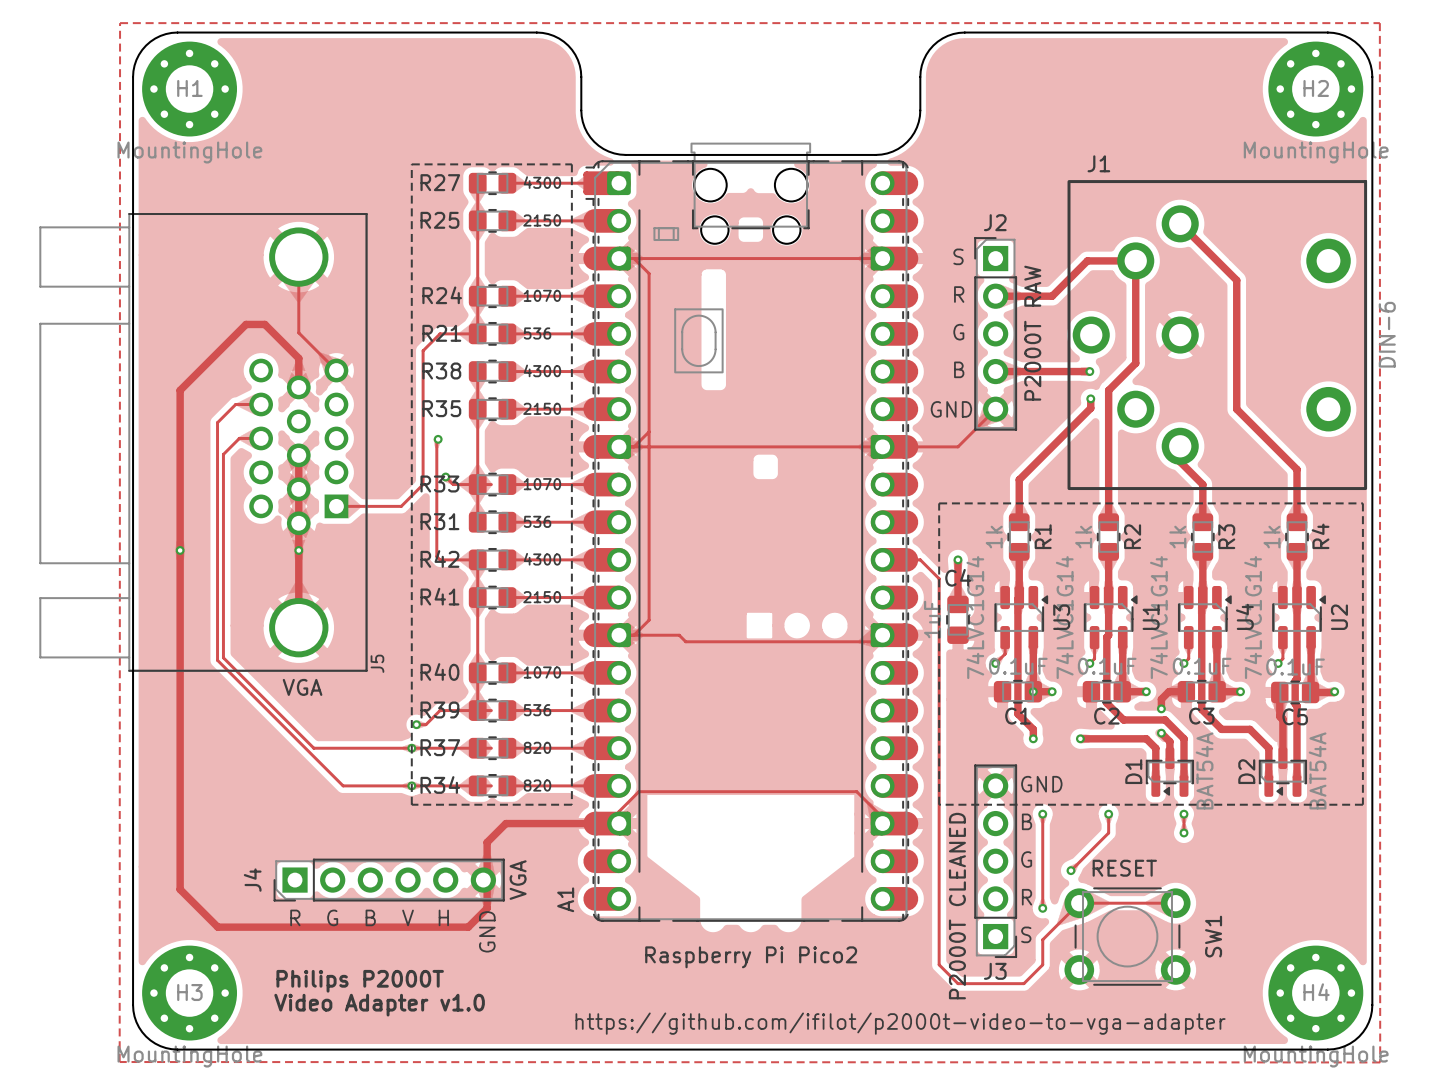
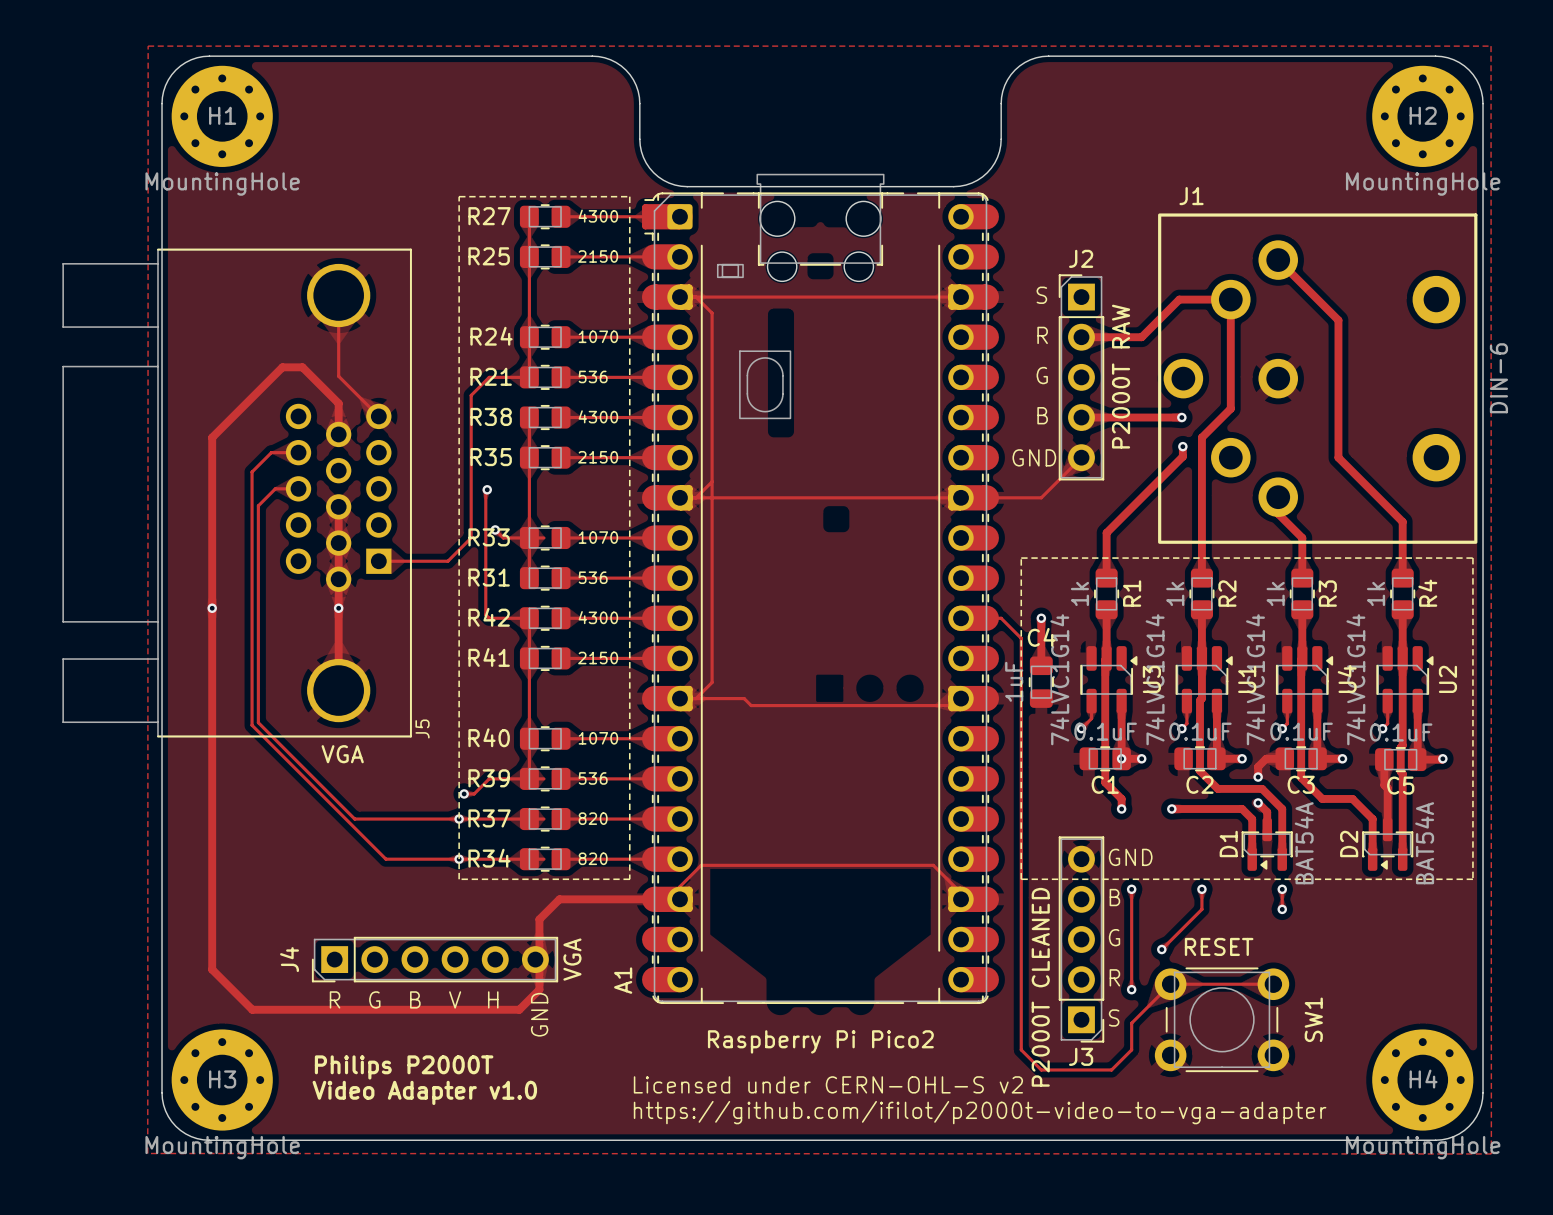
text: none -> Licensed under CERN-OHL-S v2 (828, 1084)

